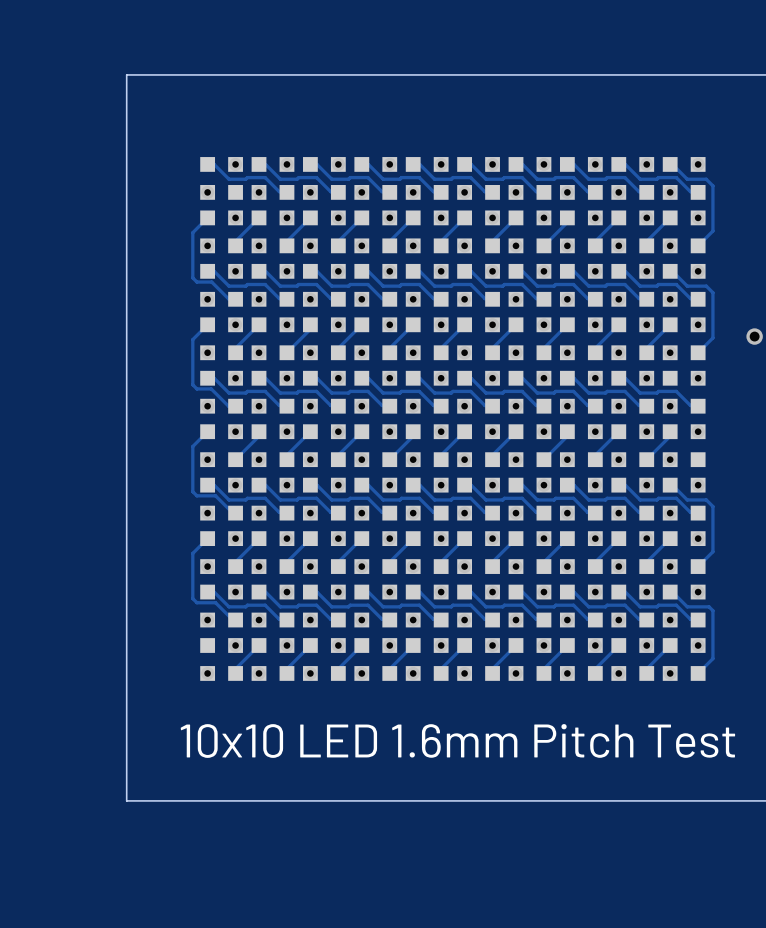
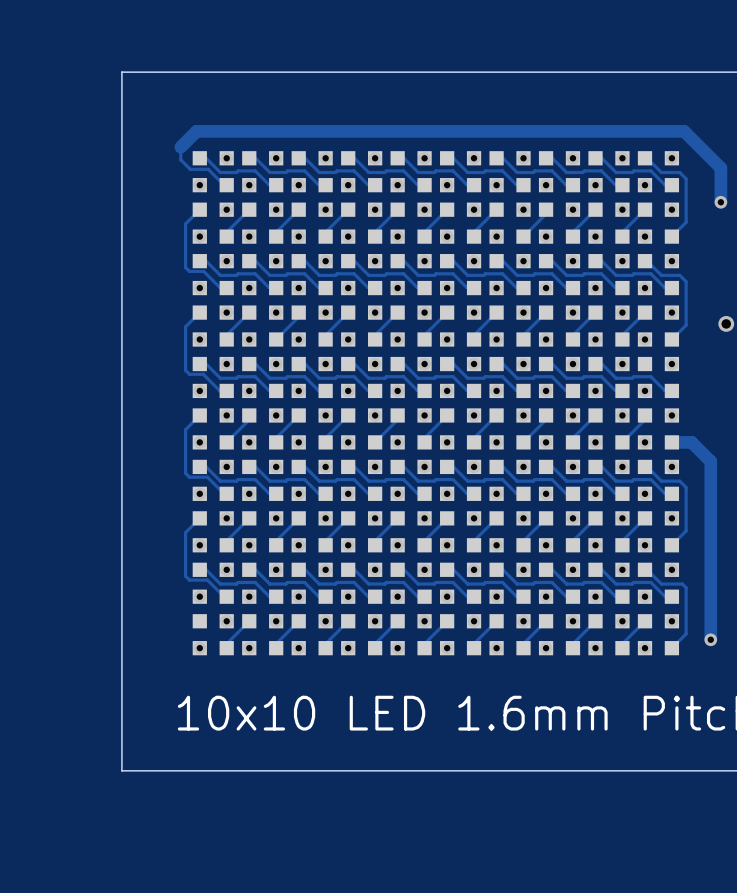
track: none -> (180, 147) (196, 131) (684, 131) (720, 168) (720, 202)
track: none -> (180, 153) (180, 159) (190, 169) (208, 169) (224, 185)
via: none -> (720, 202)
track: none -> (671, 442) (691, 442) (710, 461) (710, 639)
via: none -> (710, 639)

